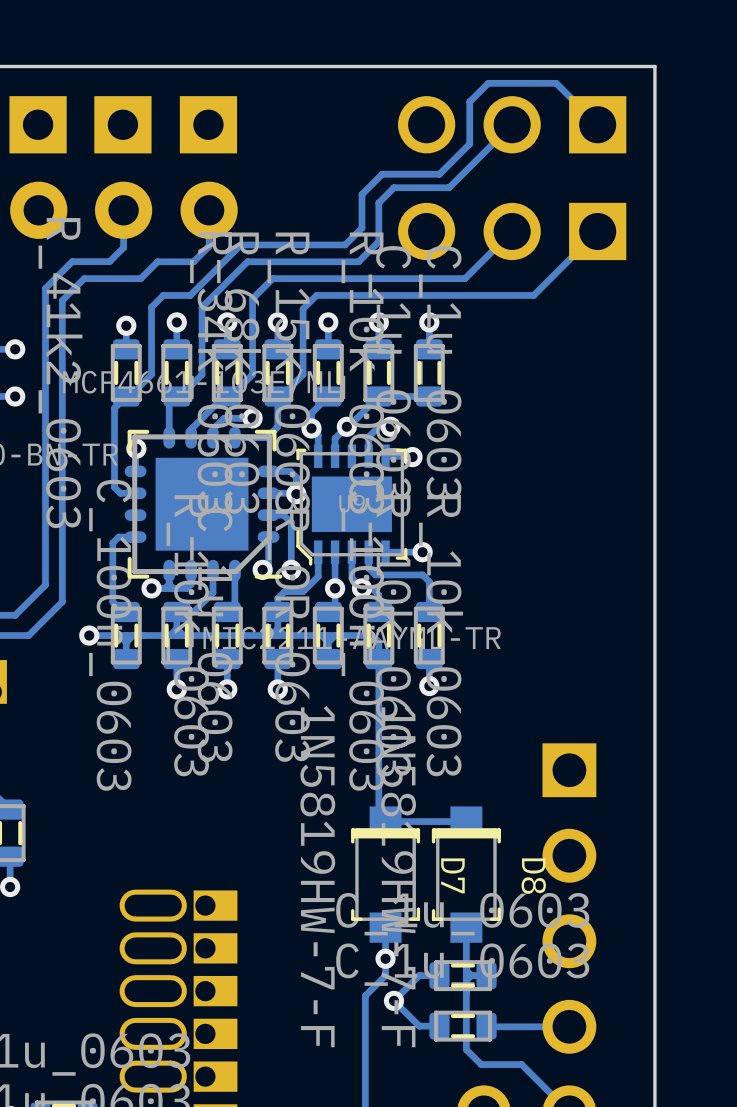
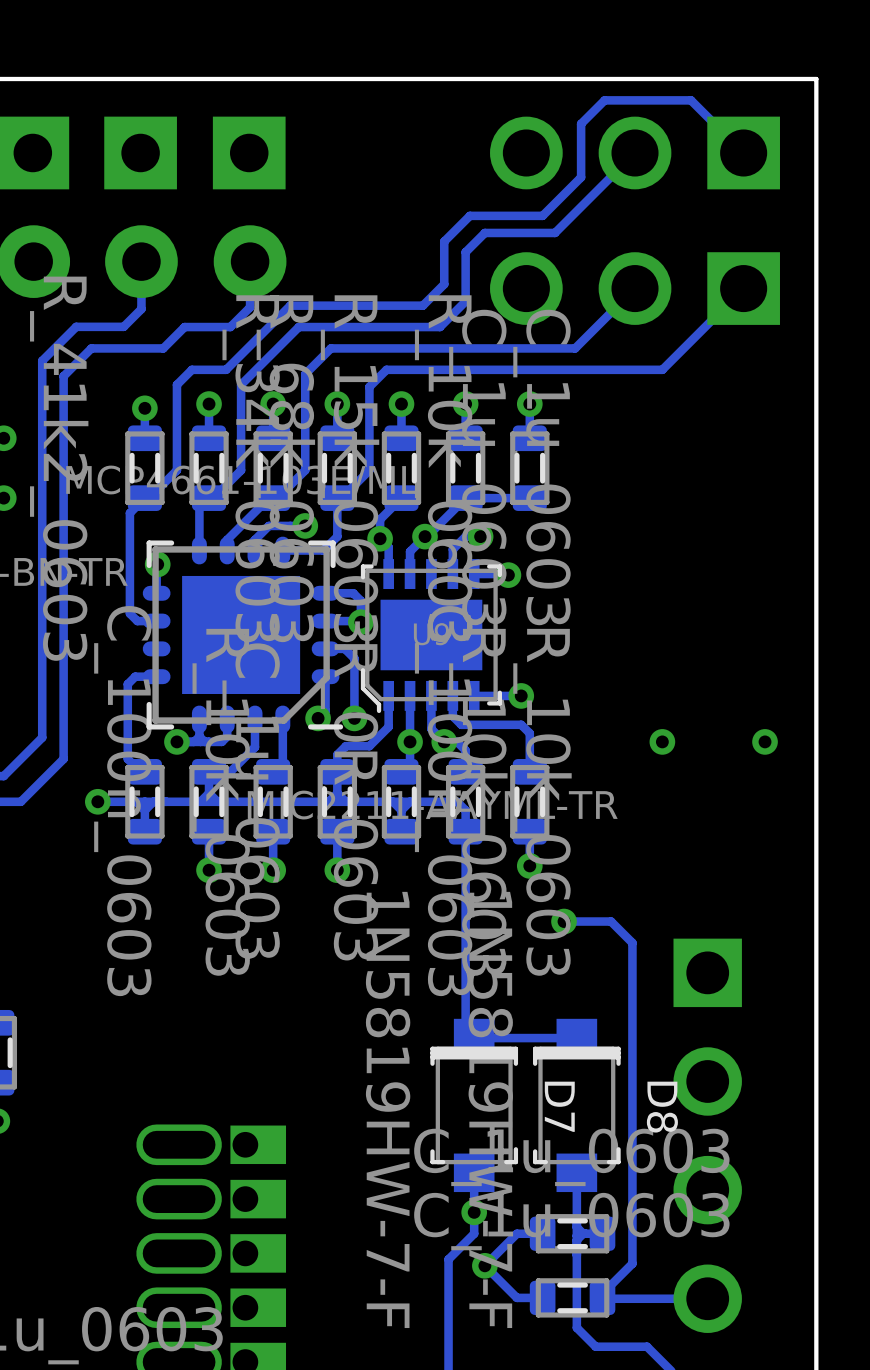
via: none -> (662, 741)
via: none -> (765, 741)
track: none -> (564, 921) (611, 921) (632, 942) (632, 1263) (602, 1293) (602, 1297)
via: none -> (564, 921)

